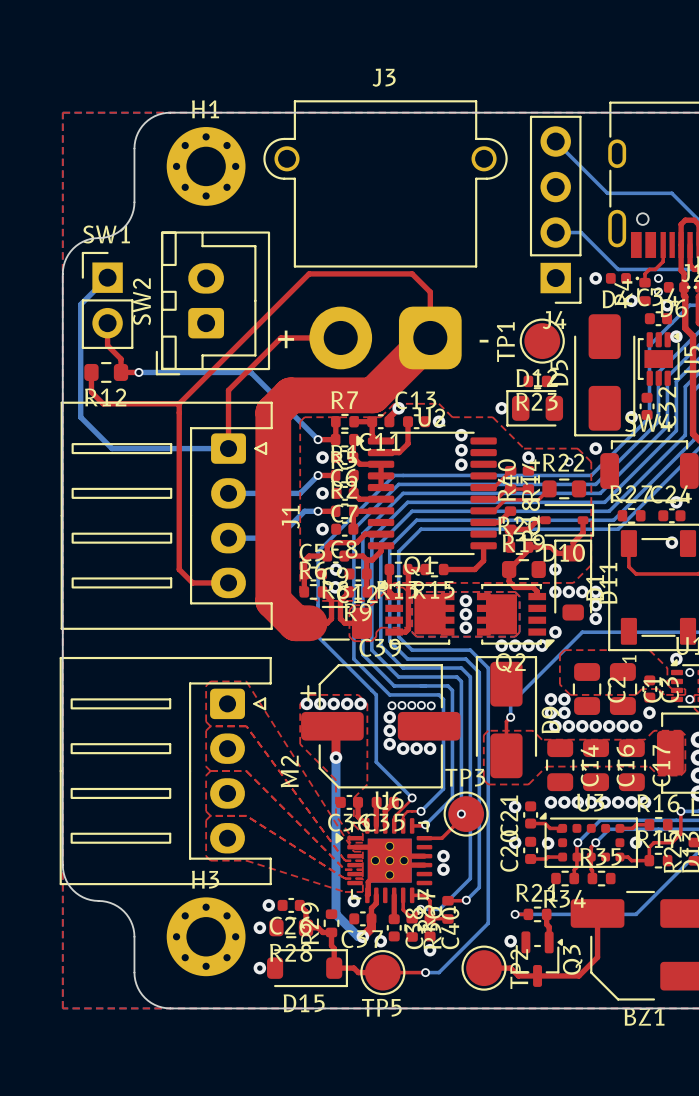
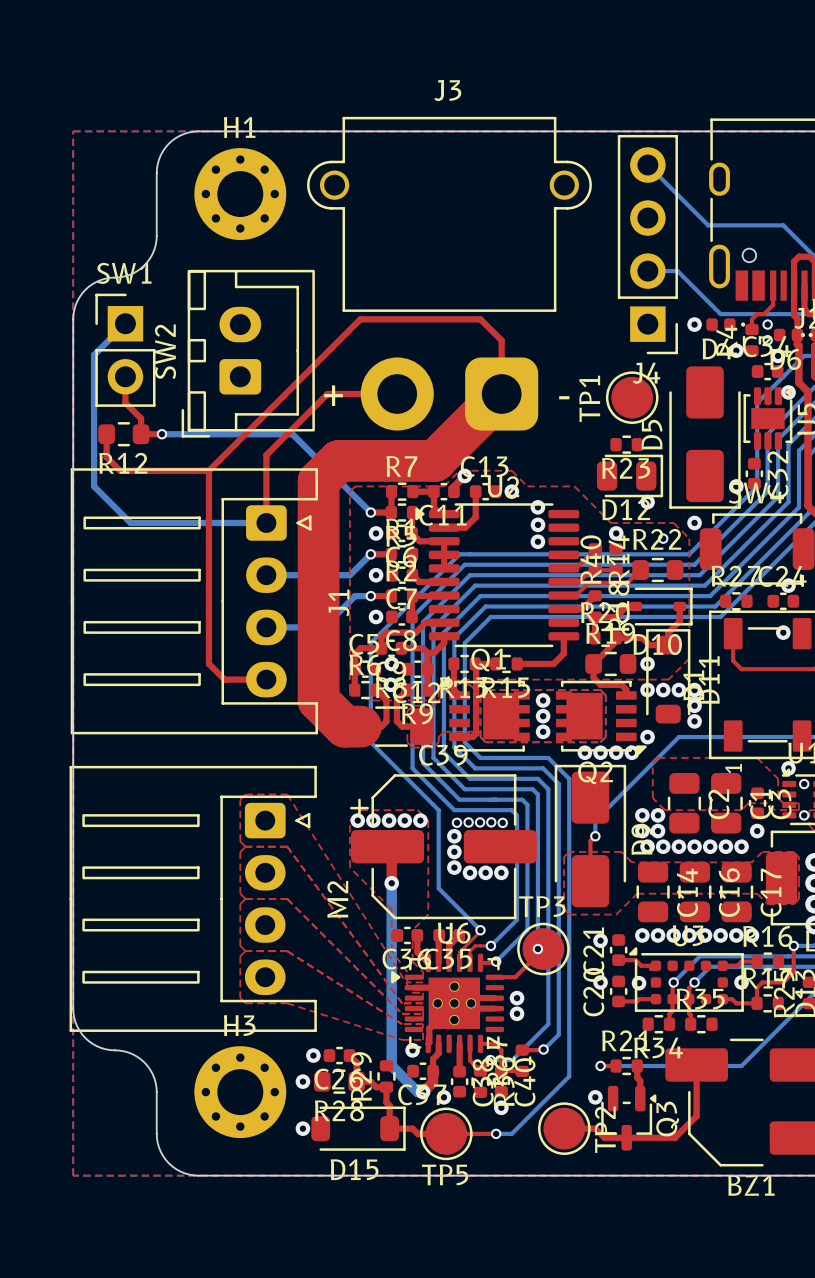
via position: (501, 408) -> (647, 502)
D12 rotation: 0° (534, 408) -> 180° (630, 475)

